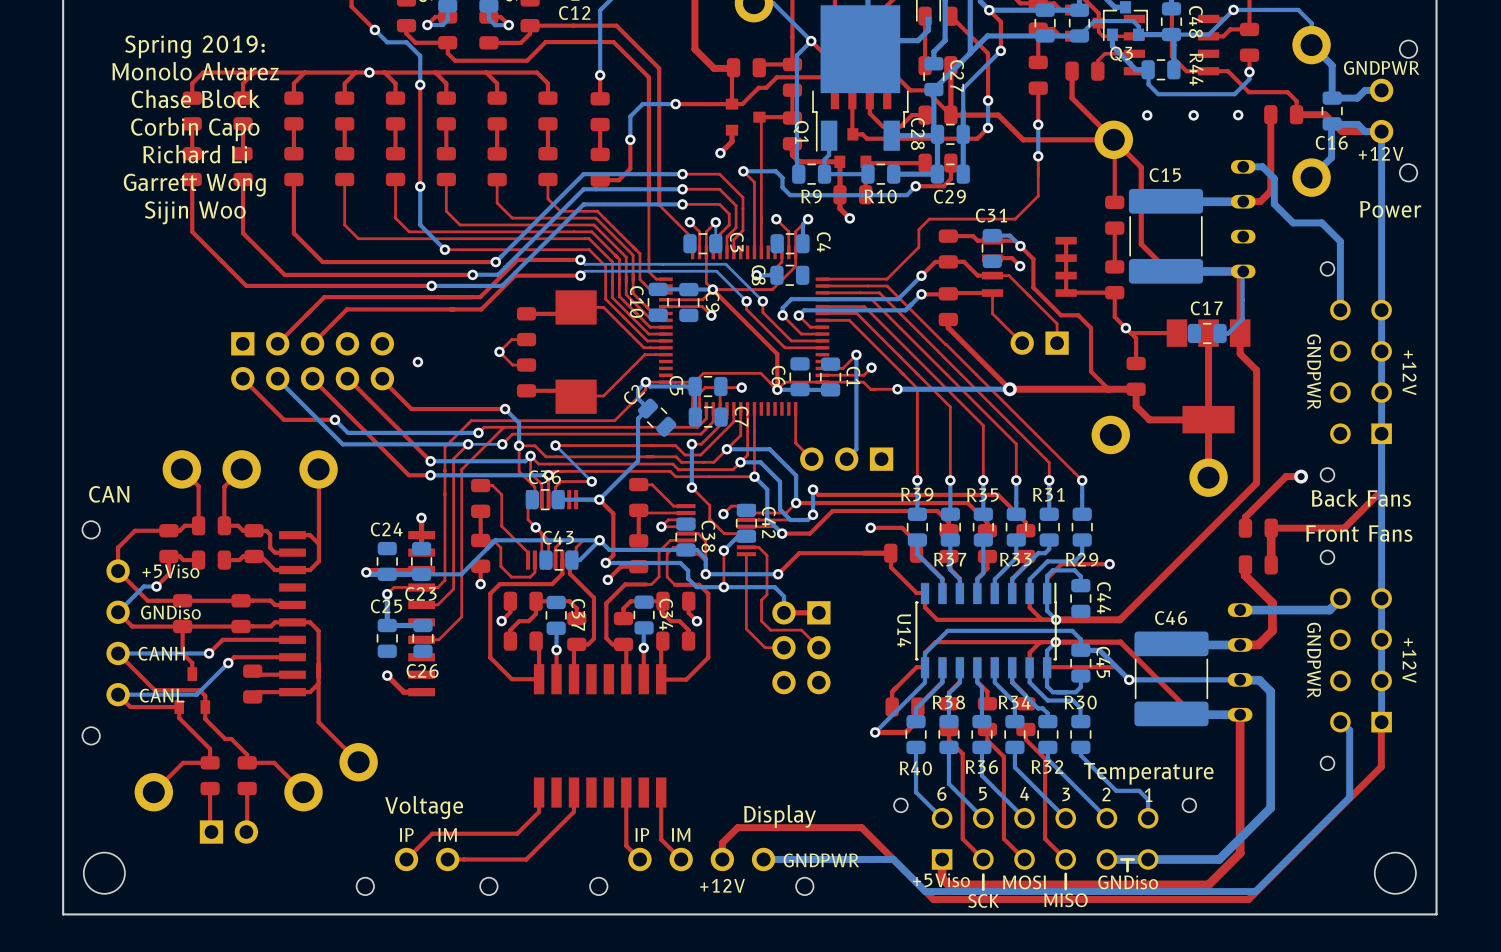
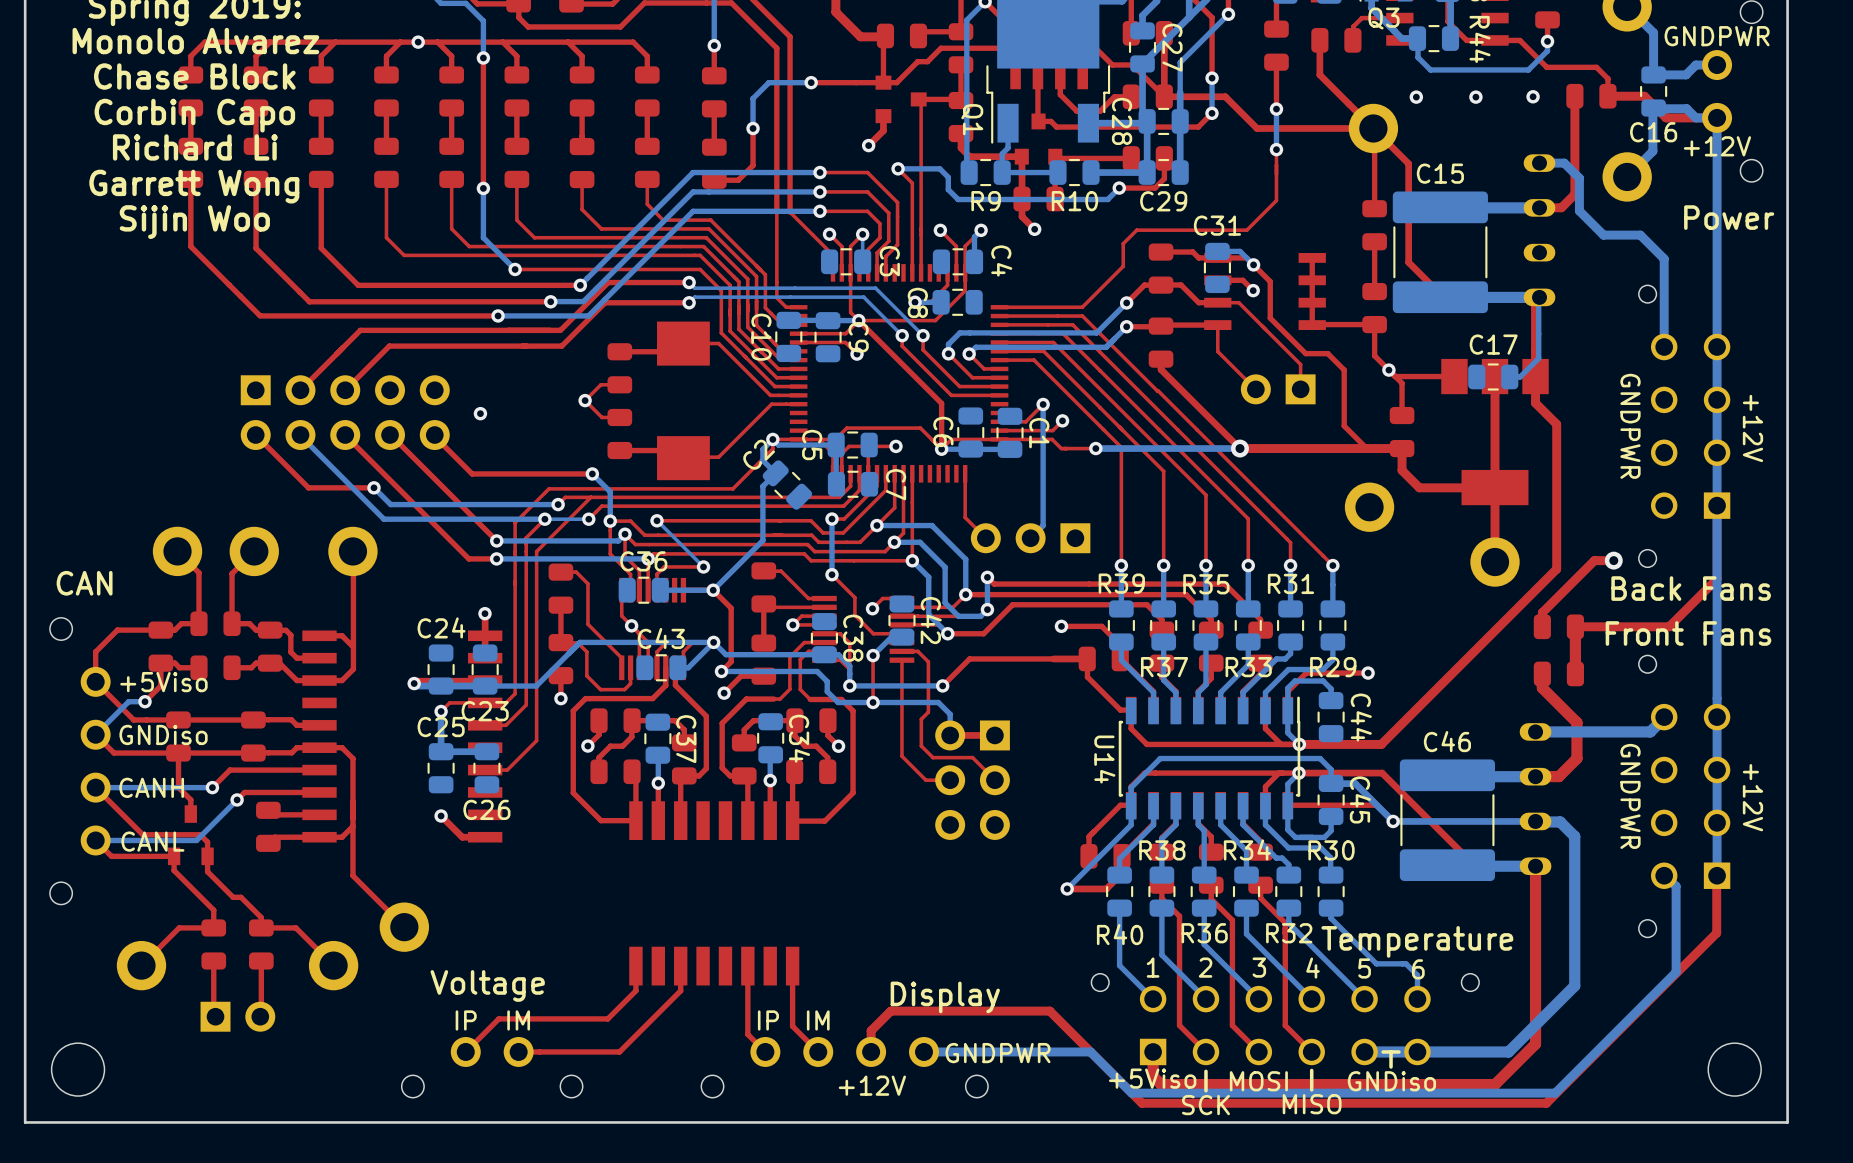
text: 6 (941, 793) -> 1 (1153, 967)
text: 5 (983, 793) -> 2 (1205, 967)
text: 4 (1024, 793) -> 3 (1259, 967)
text: 3 (1066, 794) -> 4 (1313, 968)
text: 2 (1106, 794) -> 5 (1364, 968)
text: 1 (1148, 795) -> 6 (1418, 969)

